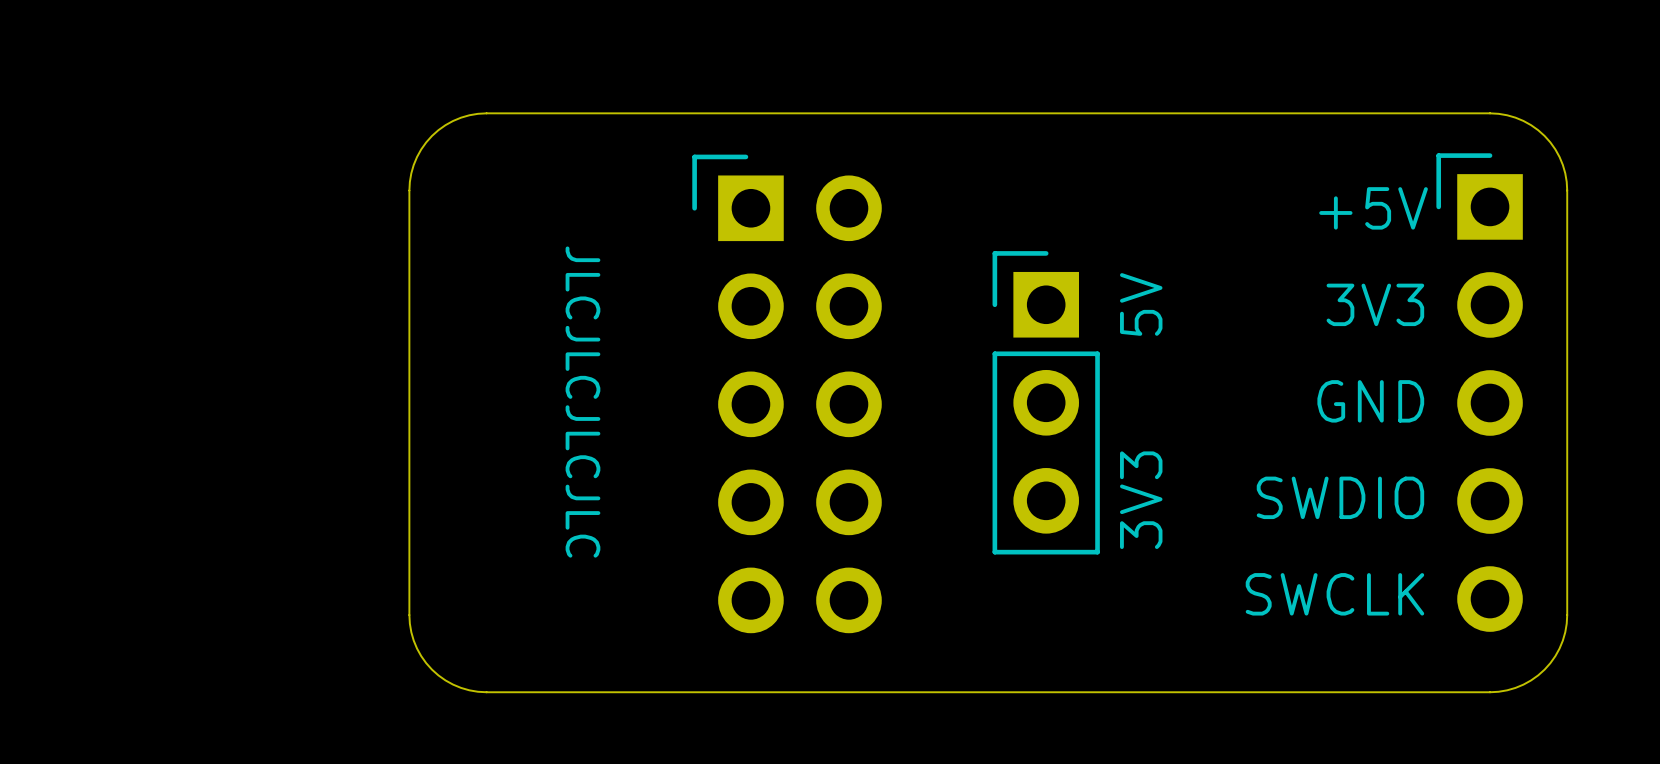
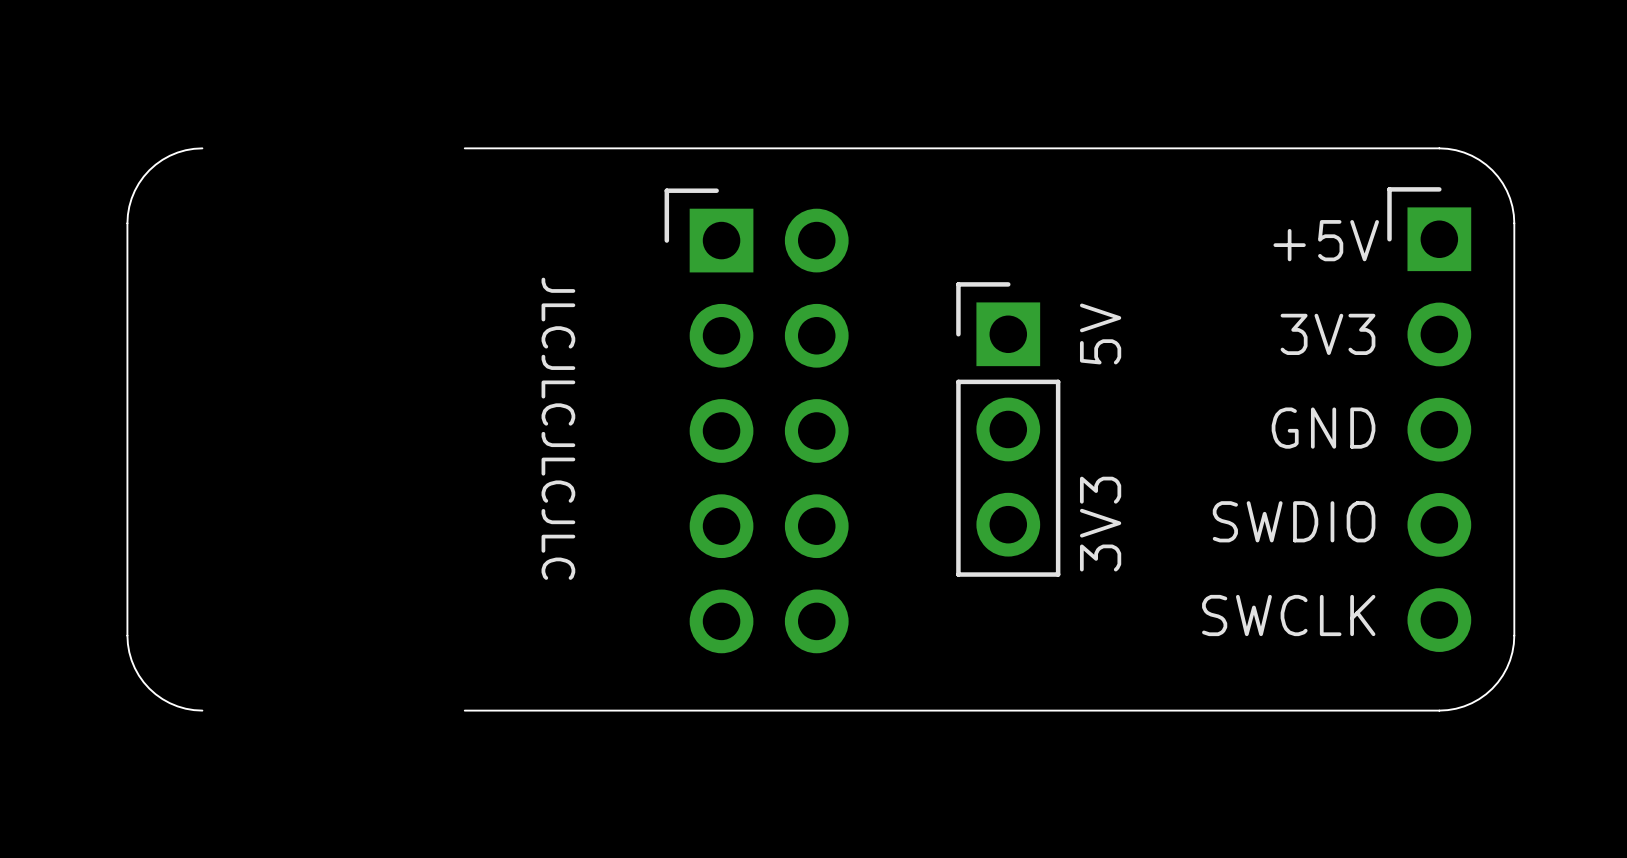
board edge: (486, 113) (461, 117) (445, 125) (431, 135) (421, 149) (413, 165) (409, 190) (409, 623) (417, 648) (431, 669) (445, 680) (461, 687) (486, 692) -> (202, 148) (177, 152) (162, 159) (149, 170) (138, 183) (131, 198) (127, 223) (127, 644) (134, 668) (143, 682) (155, 694) (177, 706) (202, 710)

